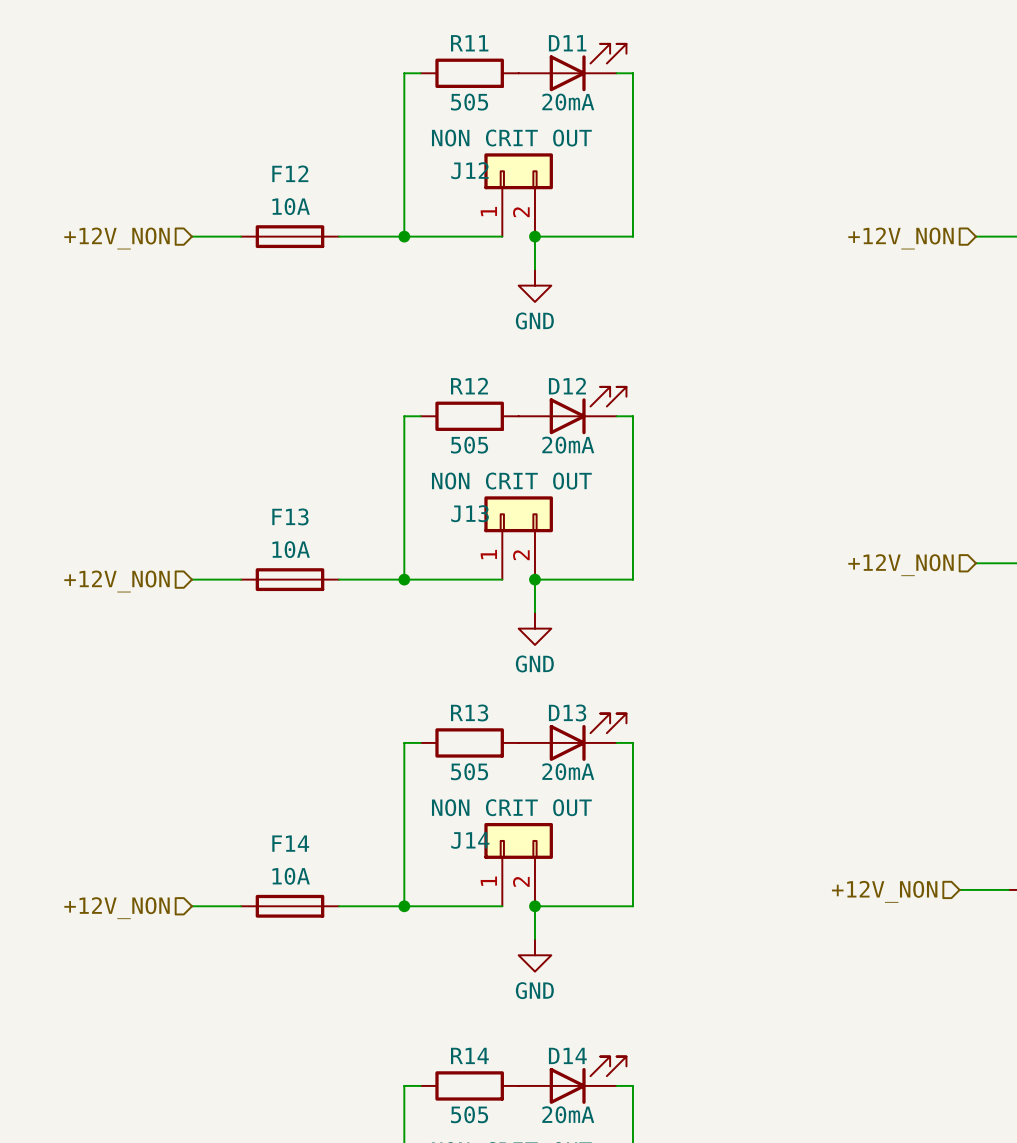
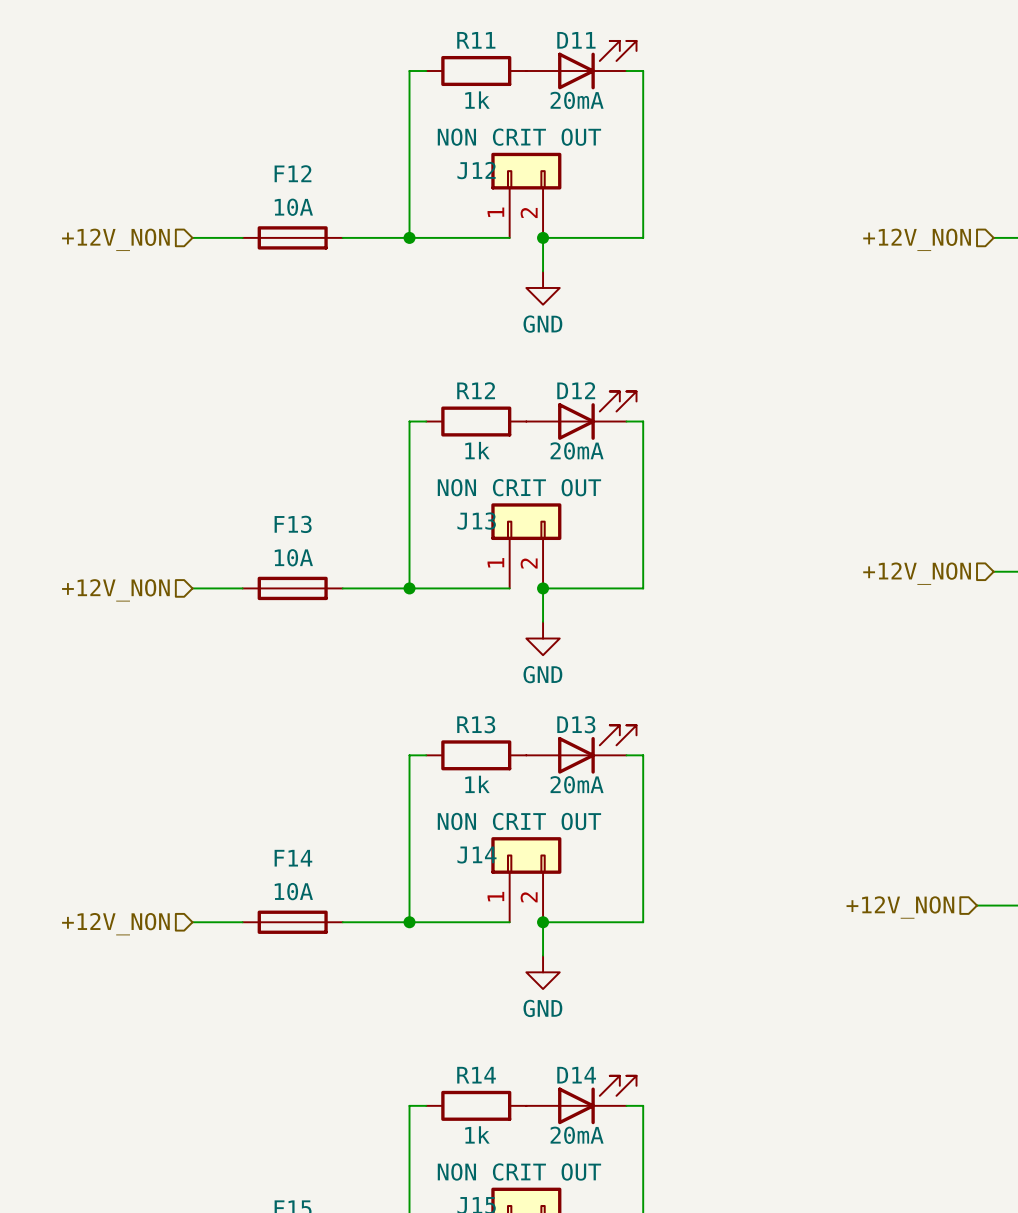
R11 value: 505 (469, 102) -> 1k (477, 100)
R12 value: 505 (469, 445) -> 1k (477, 450)
R13 value: 505 (469, 771) -> 1k (477, 784)
R14 value: 505 (469, 1114) -> 1k (477, 1134)

